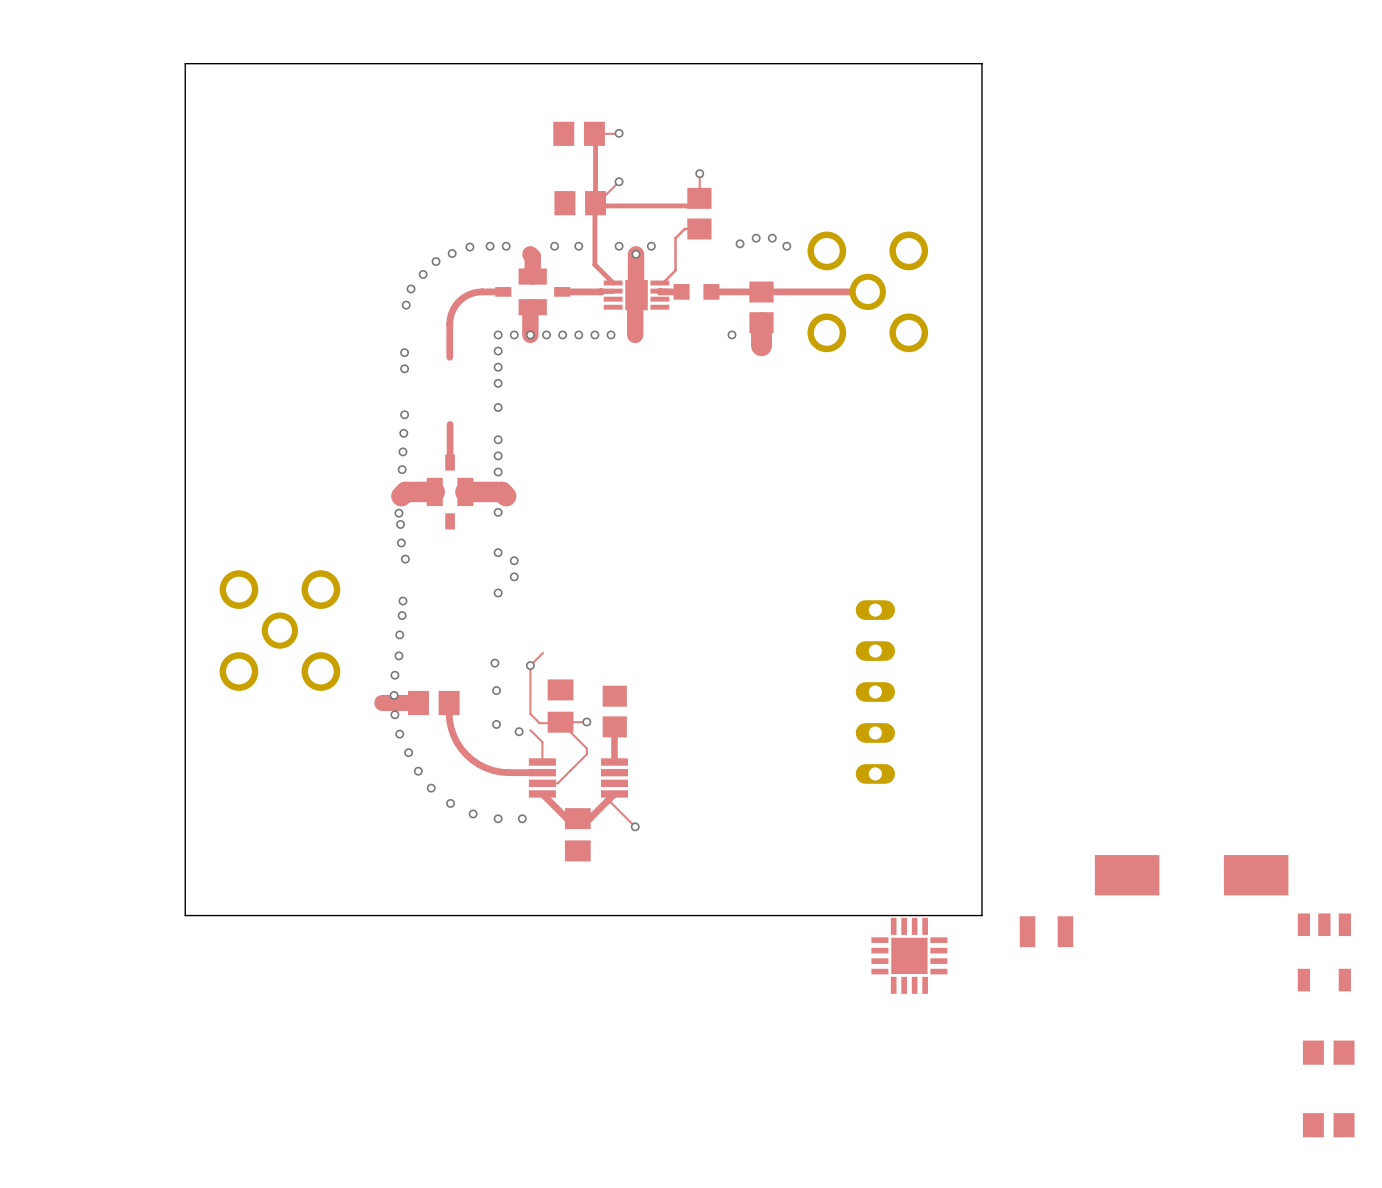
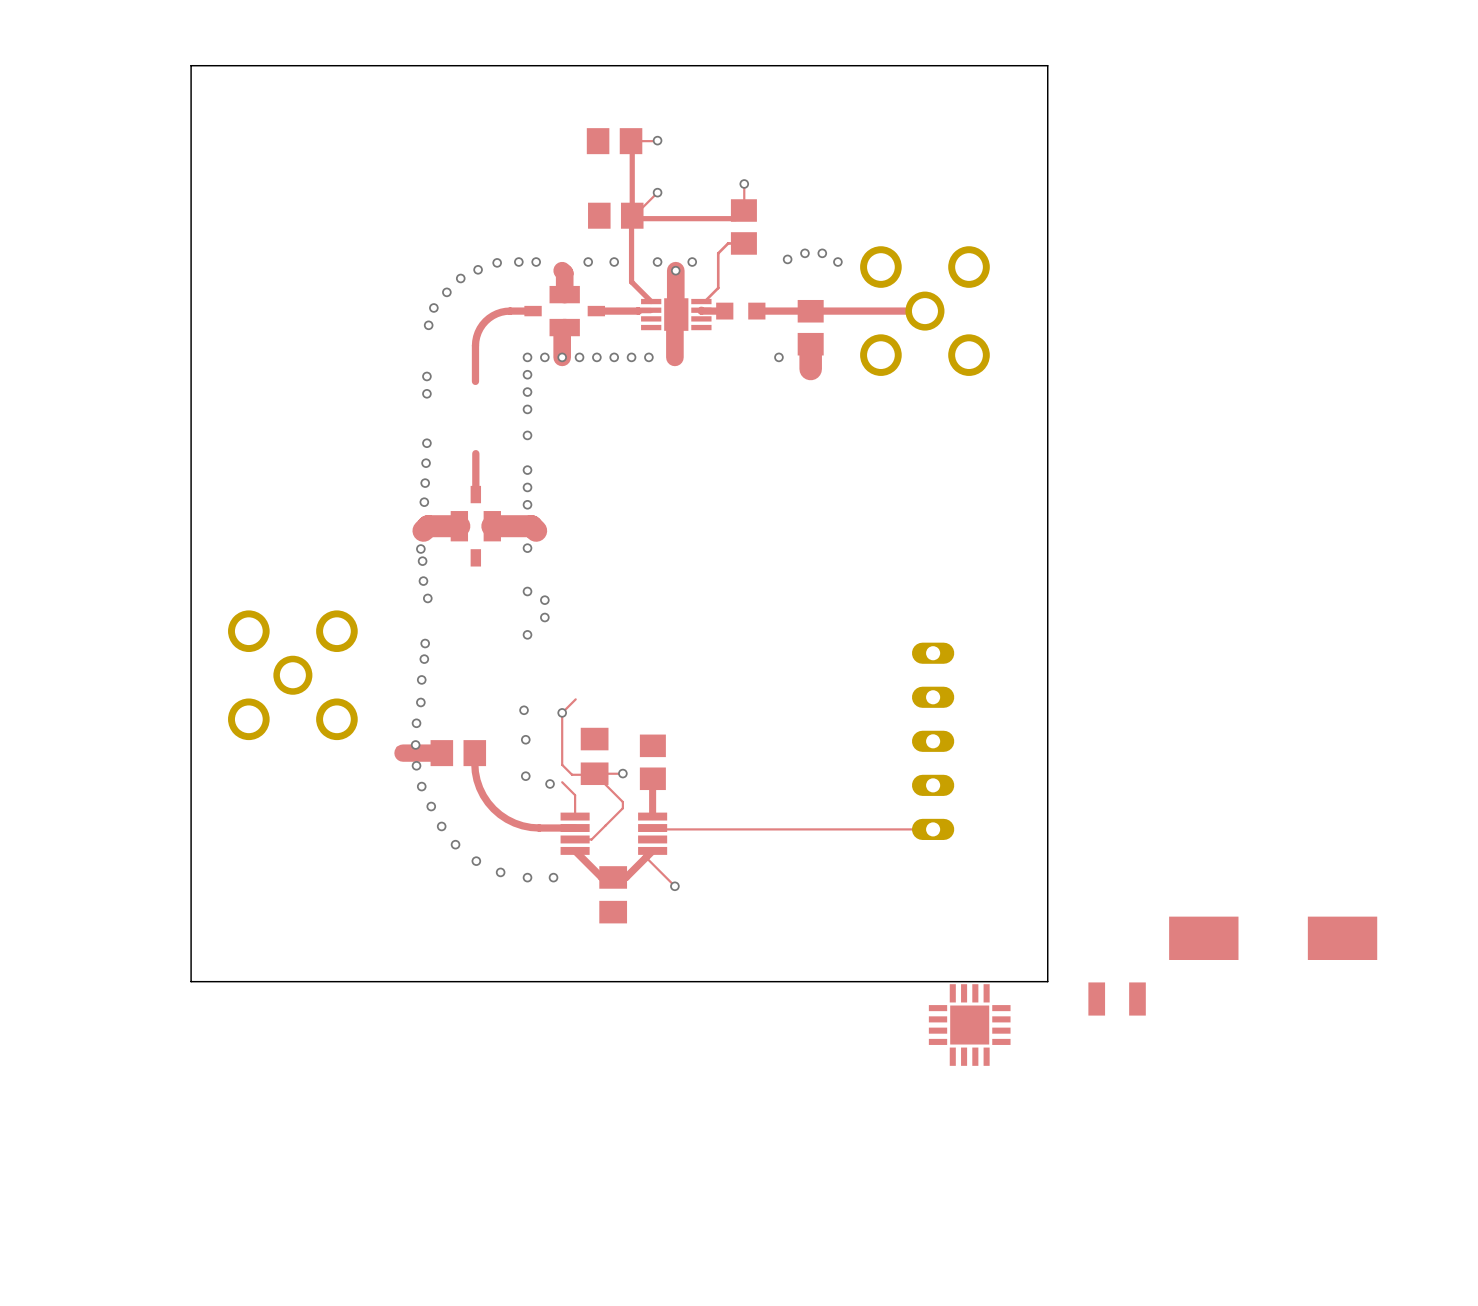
top track: none -> (933, 829) (654, 829)
part: (1324, 952) -> none
part: (1328, 1052) -> none
part: (1328, 1125) -> none

